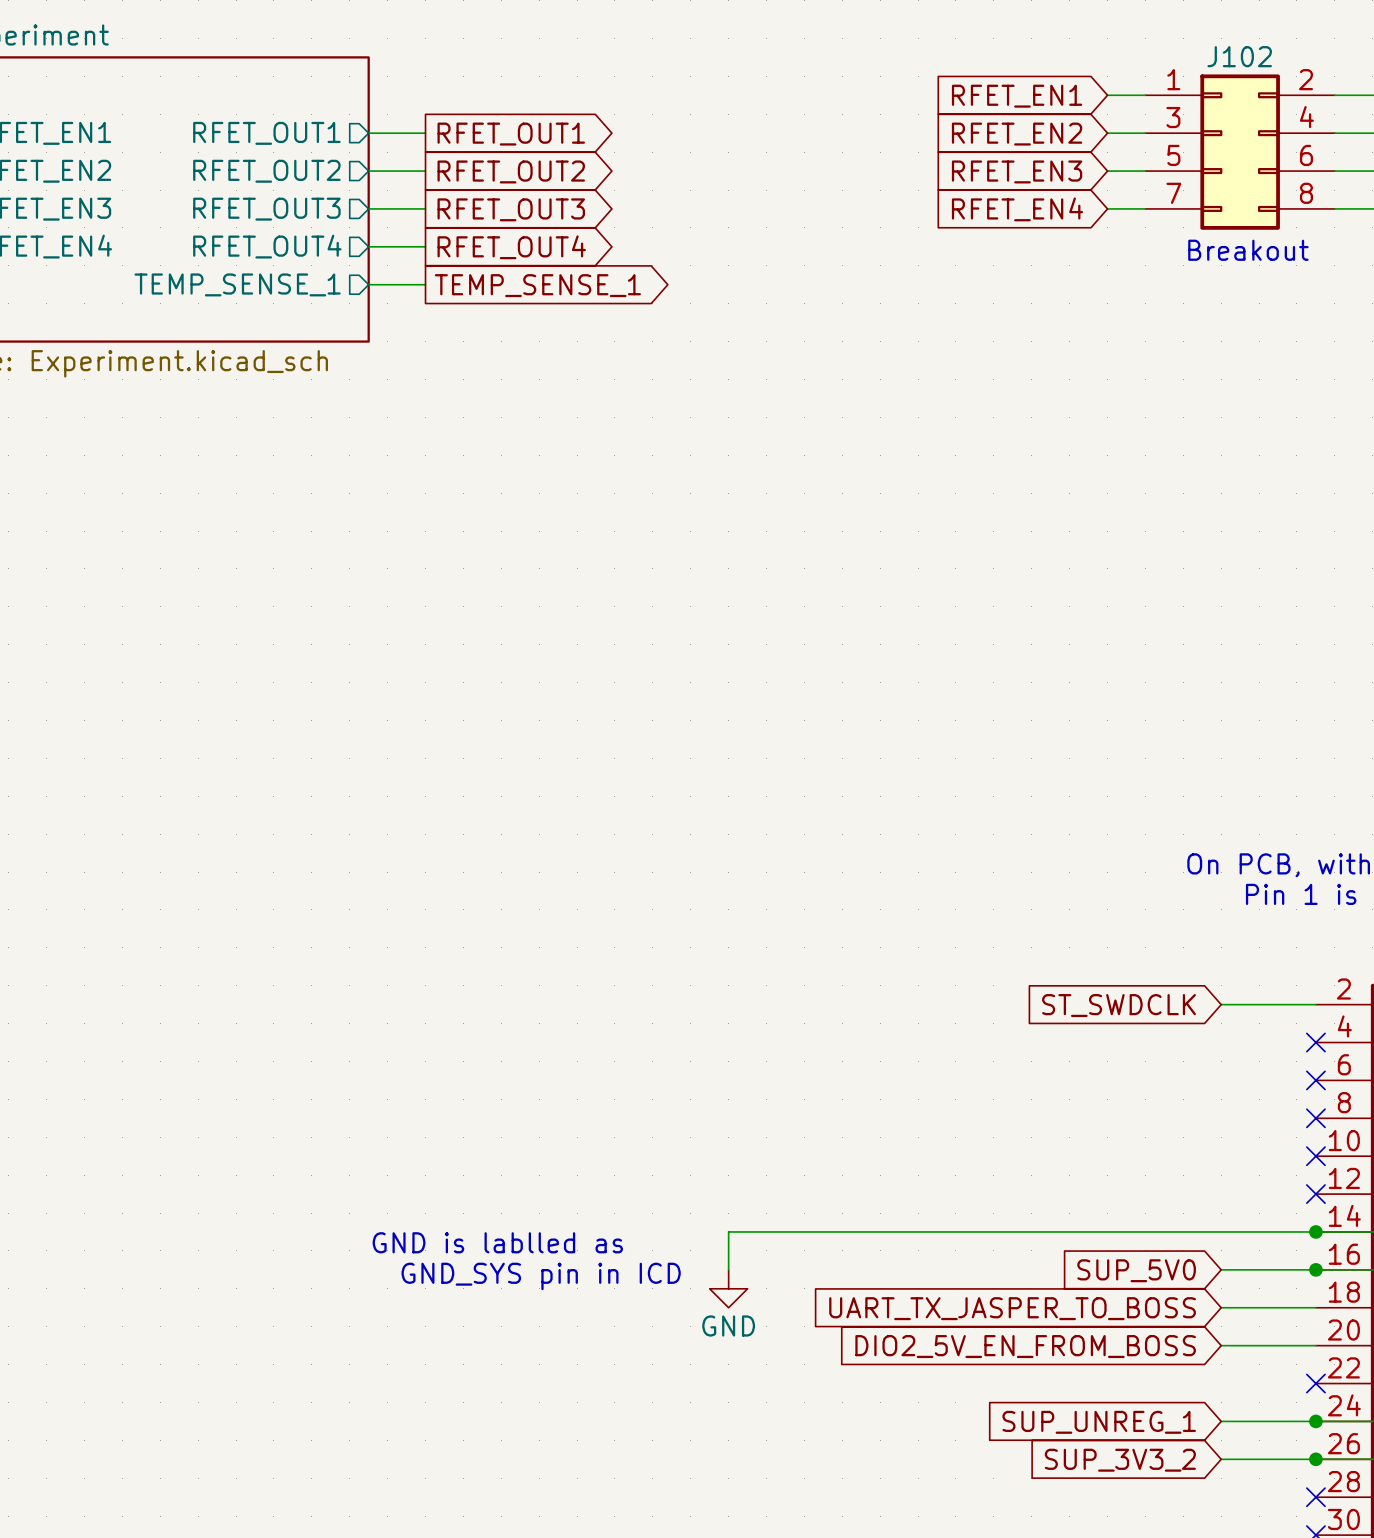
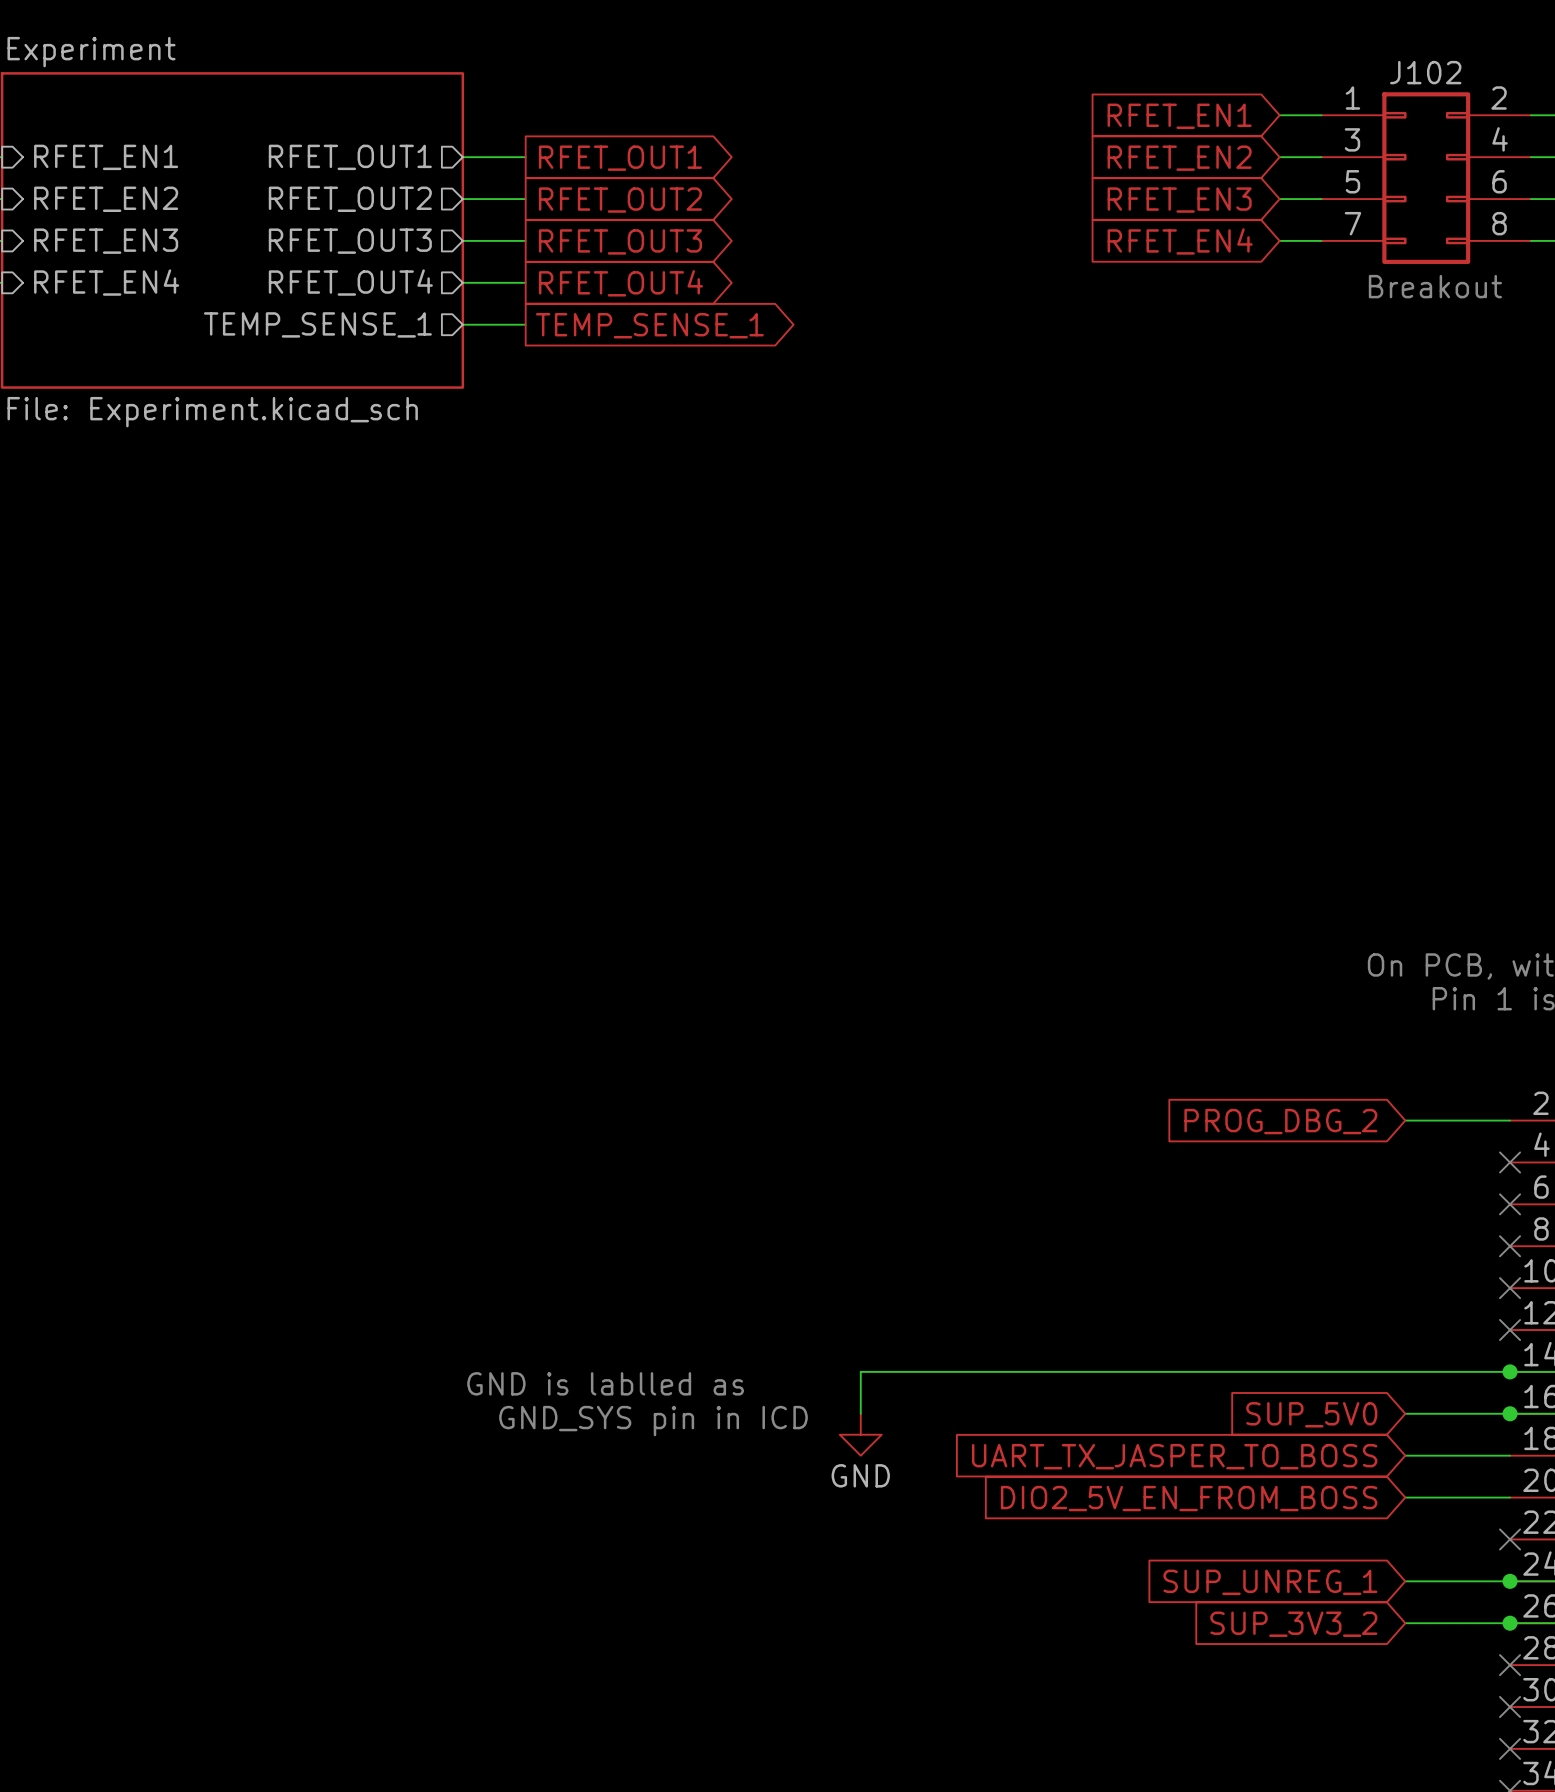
global label: ST_SWDCLK (1119, 1005) -> PROG_DBG_2 (1280, 1121)

